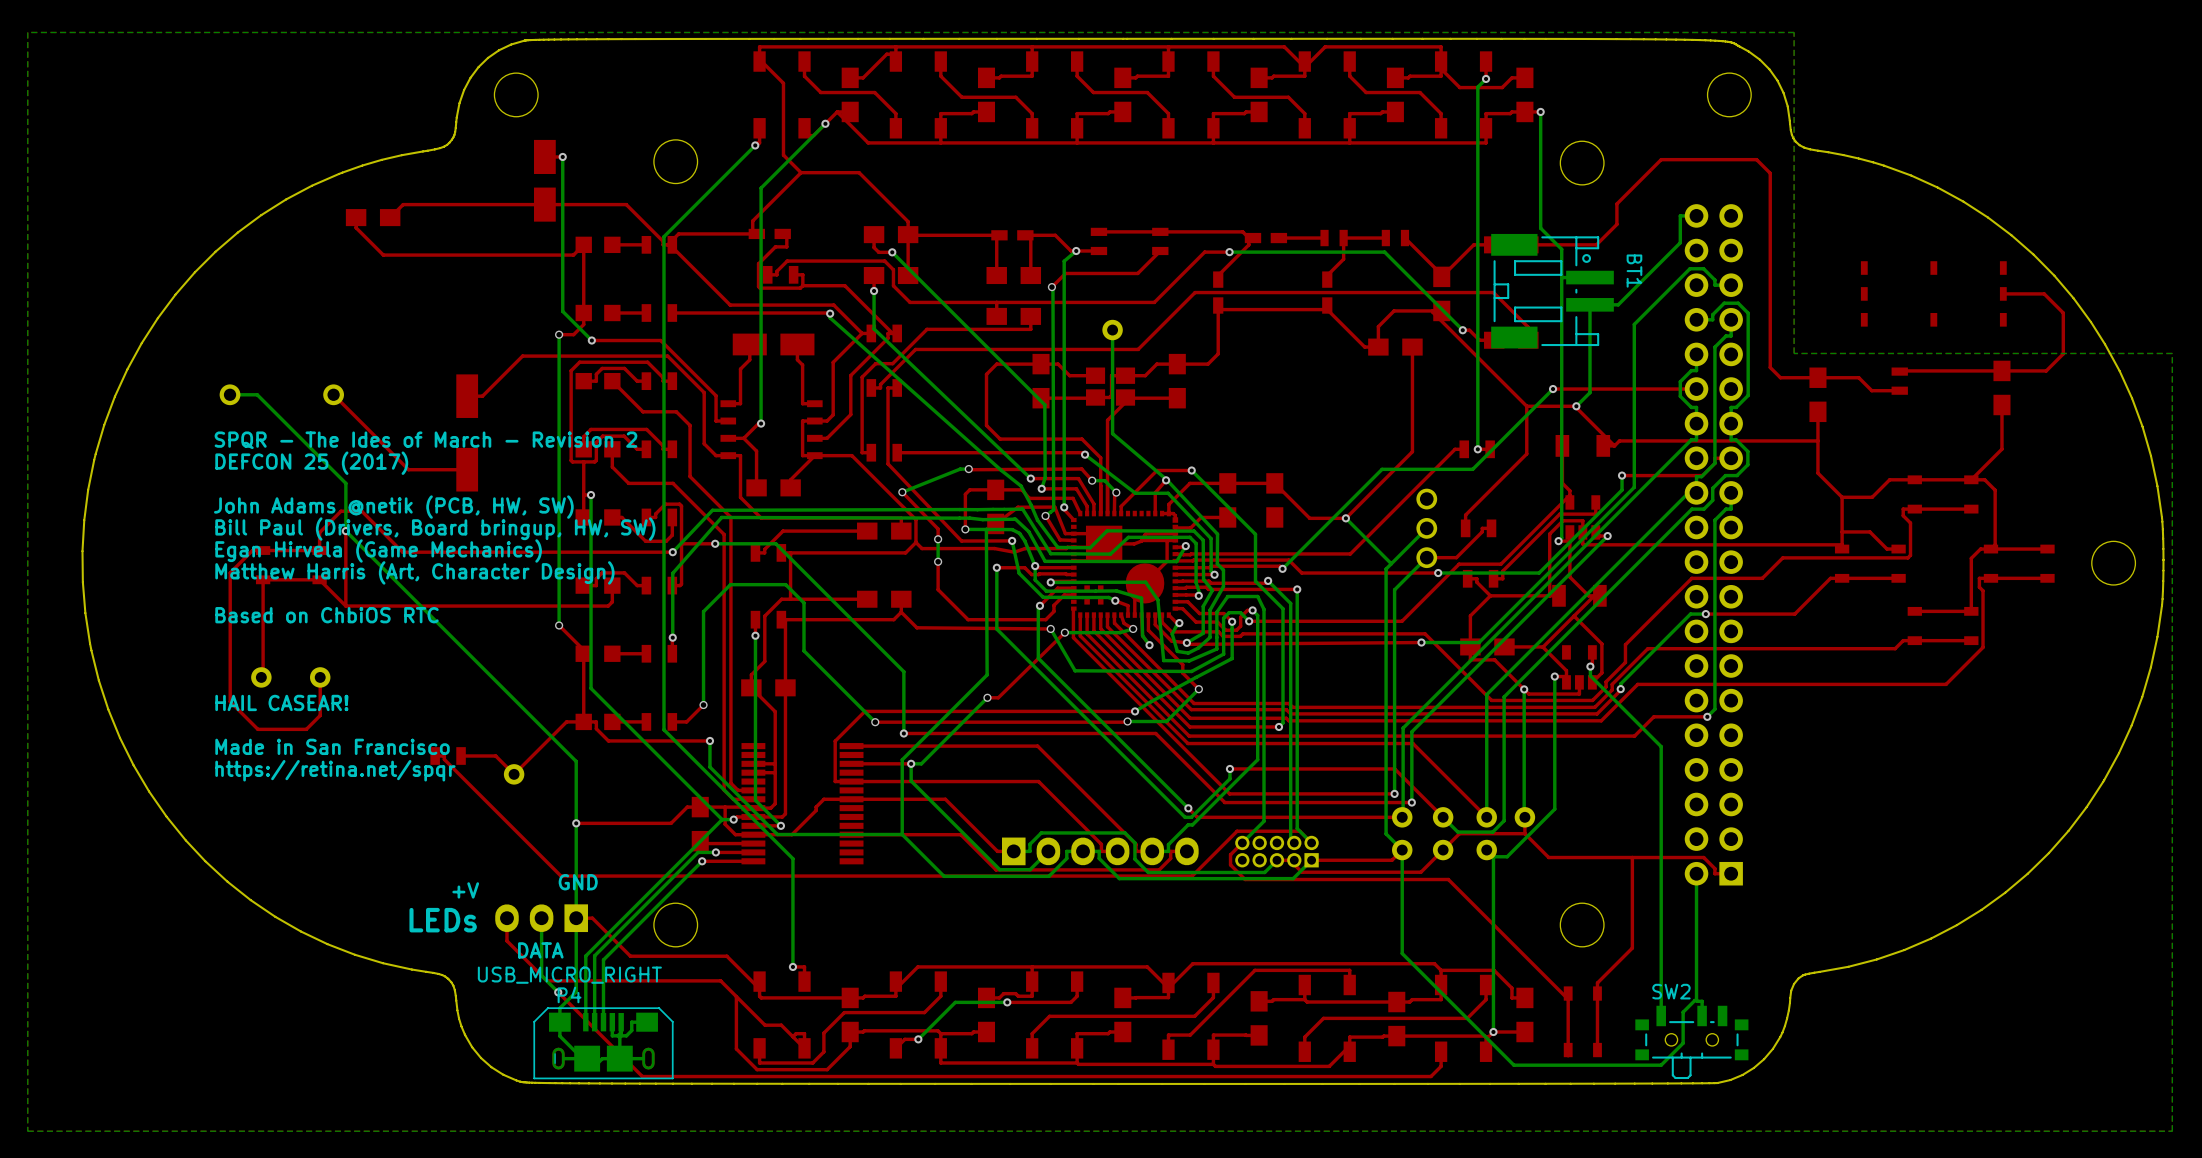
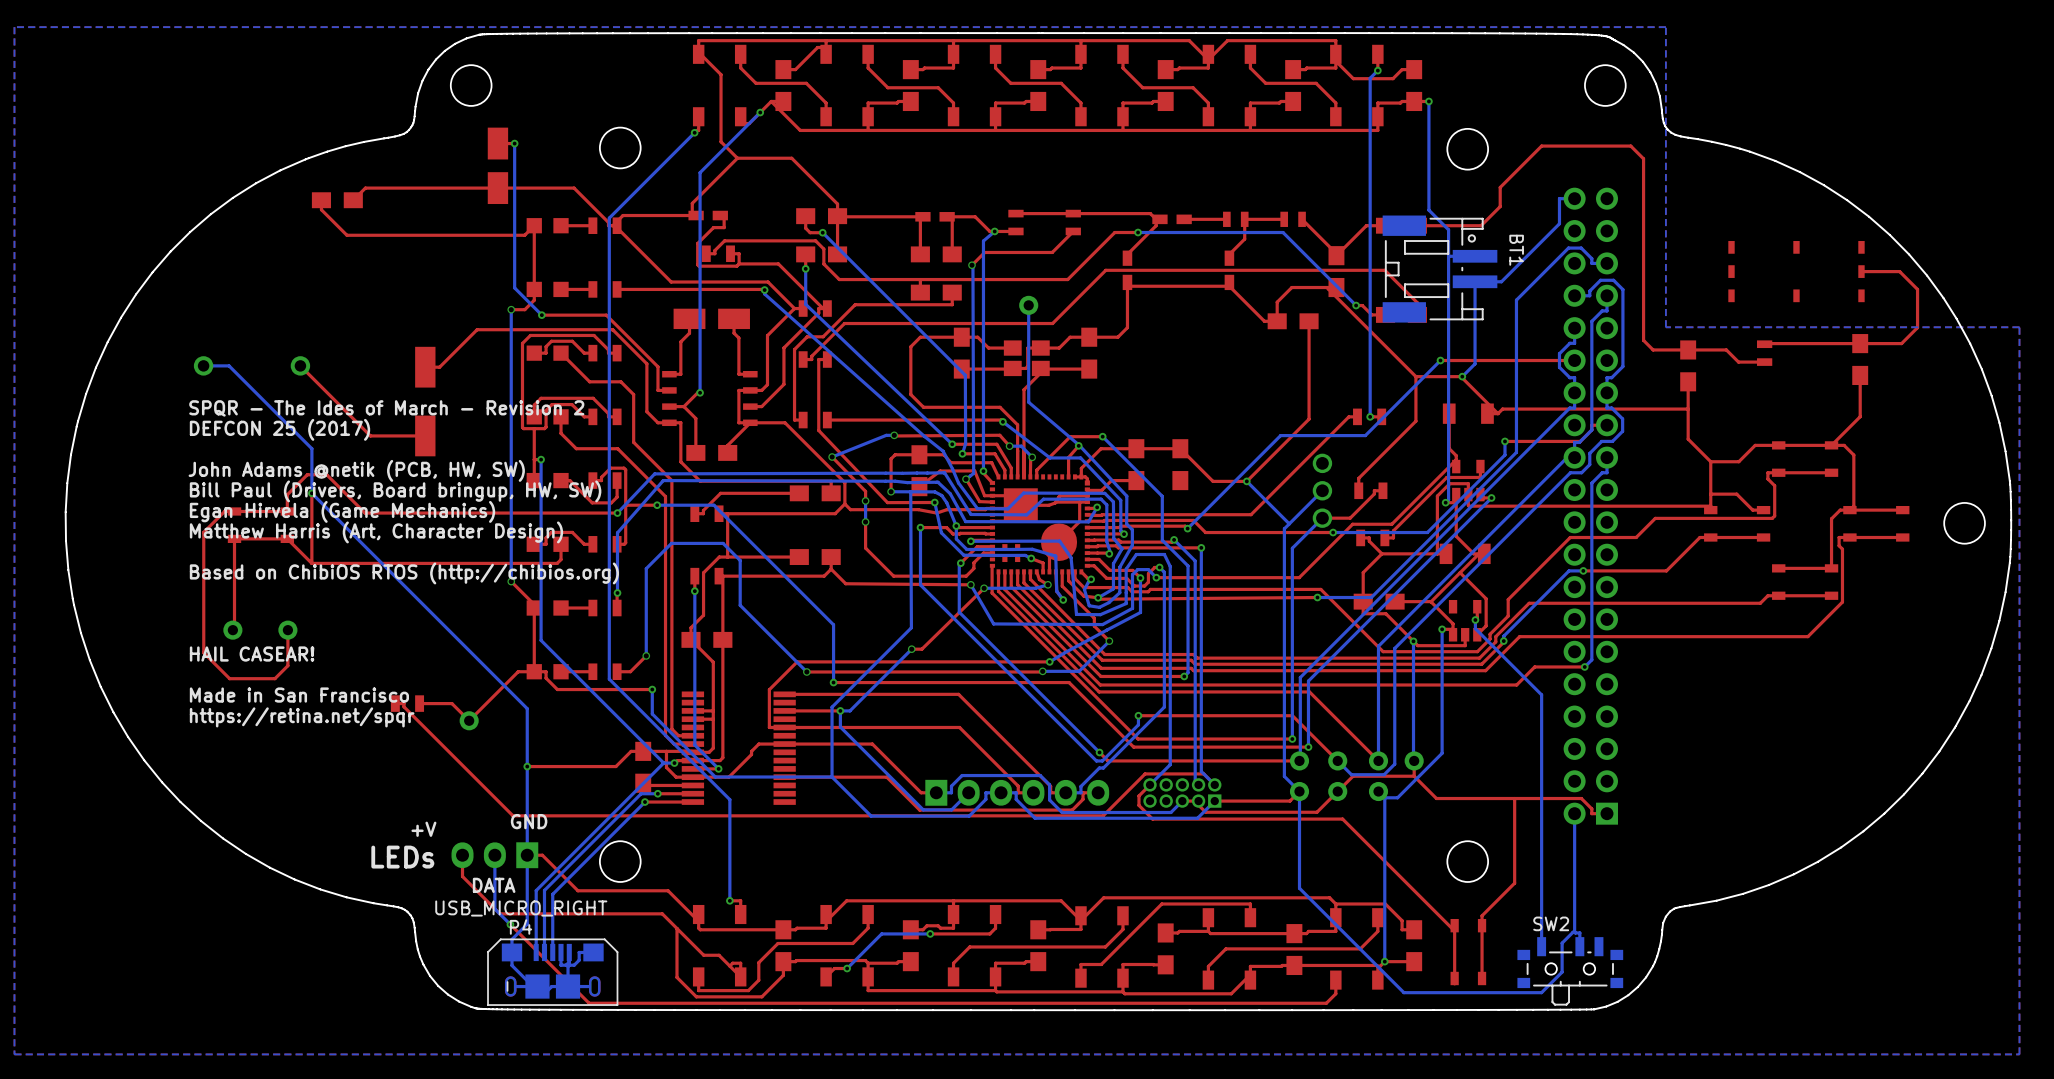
text: Based on ChbiOS RTC (327, 615) -> Based on ChibiOS RTOS (http://chibios.org) (404, 573)

